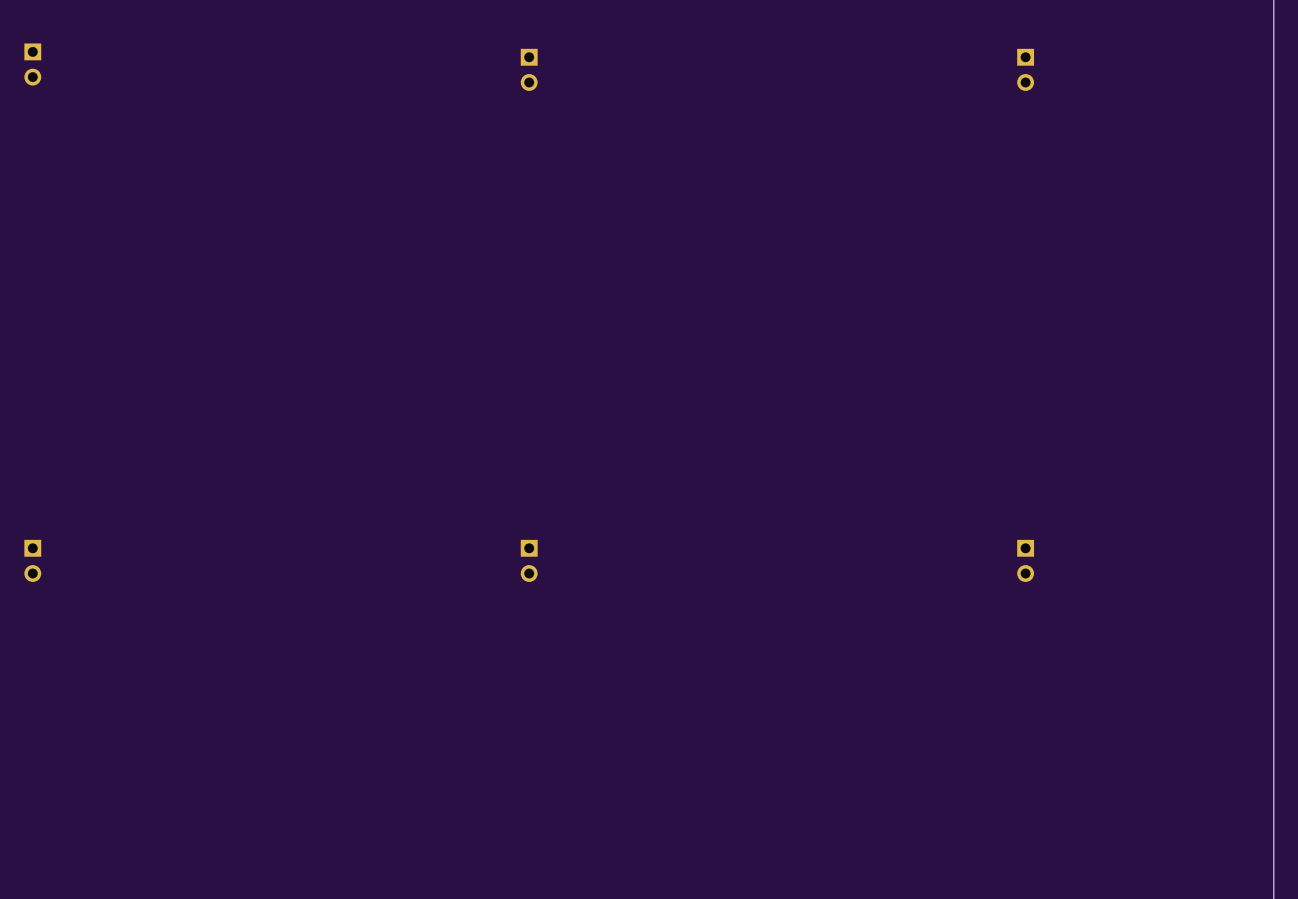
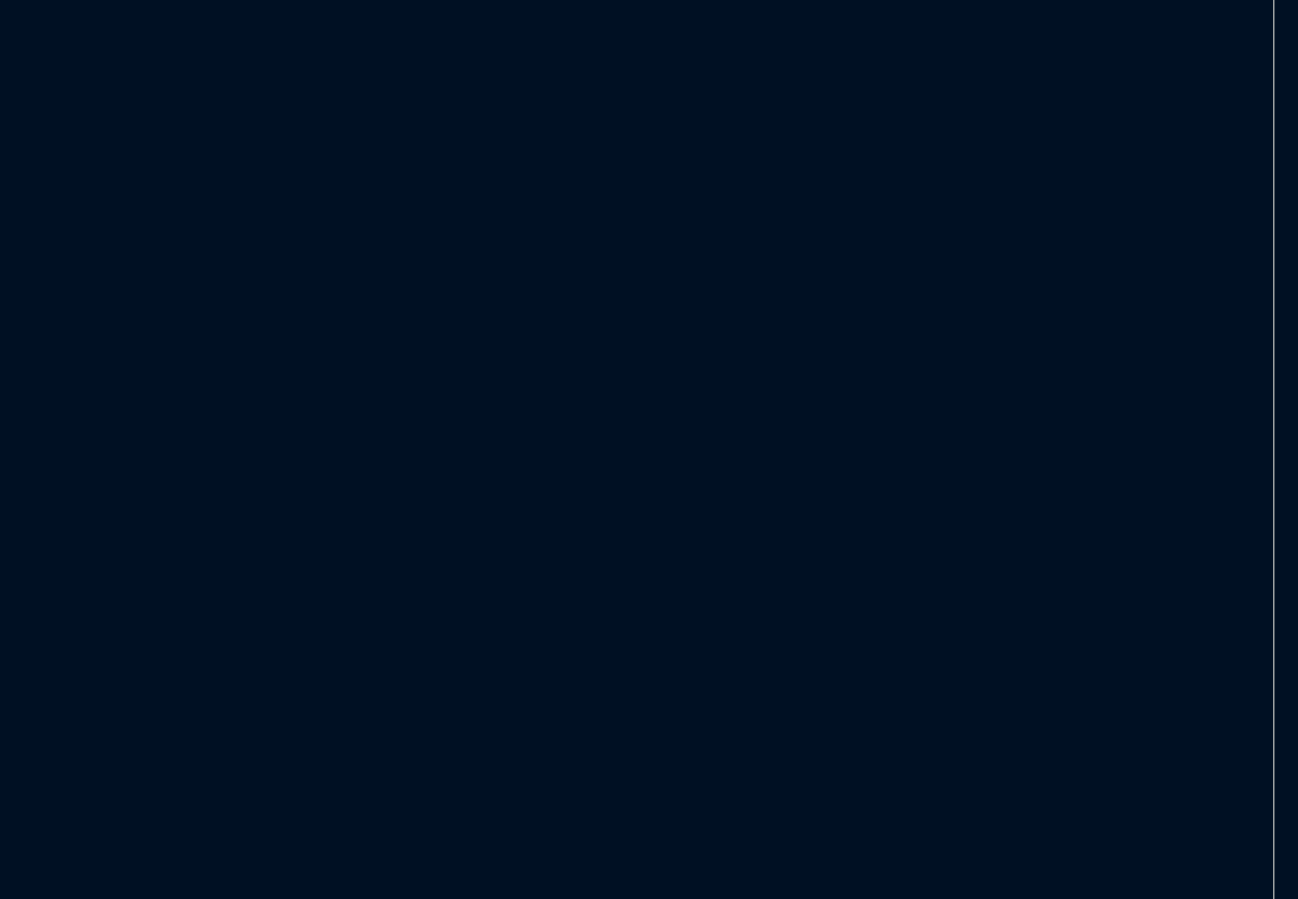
part: (32, 64) -> none
part: (529, 69) -> none
part: (1025, 69) -> none
part: (32, 560) -> none
part: (529, 560) -> none
part: (1025, 560) -> none

